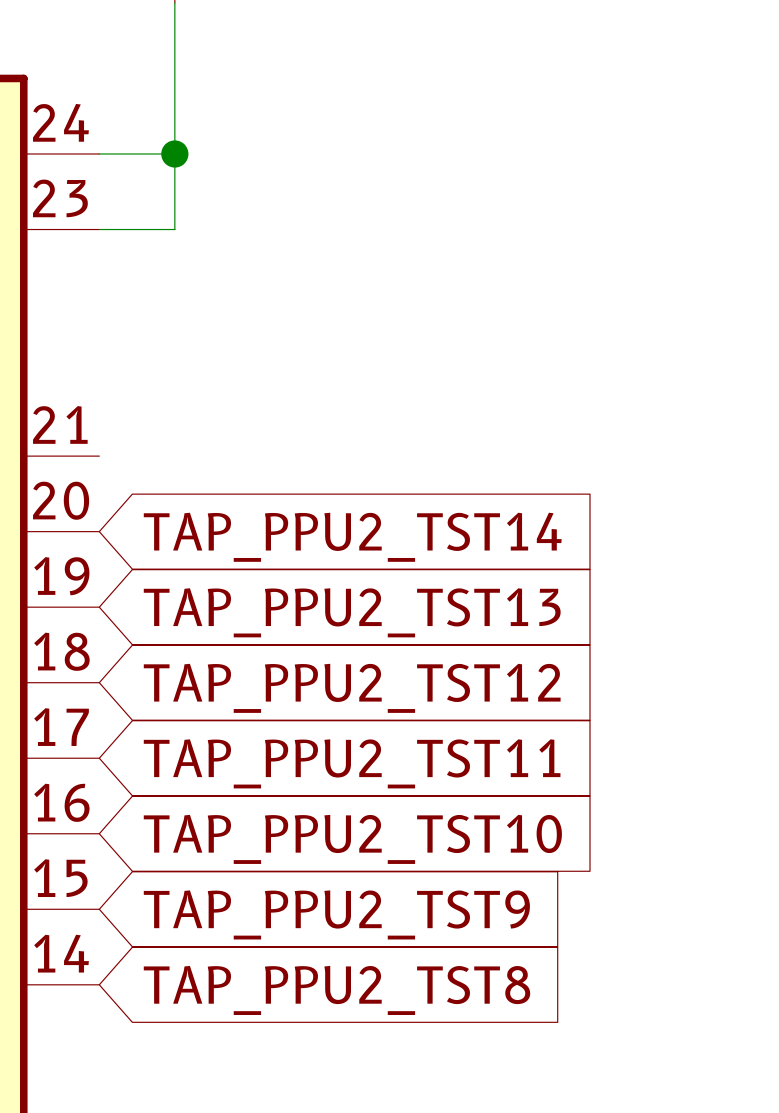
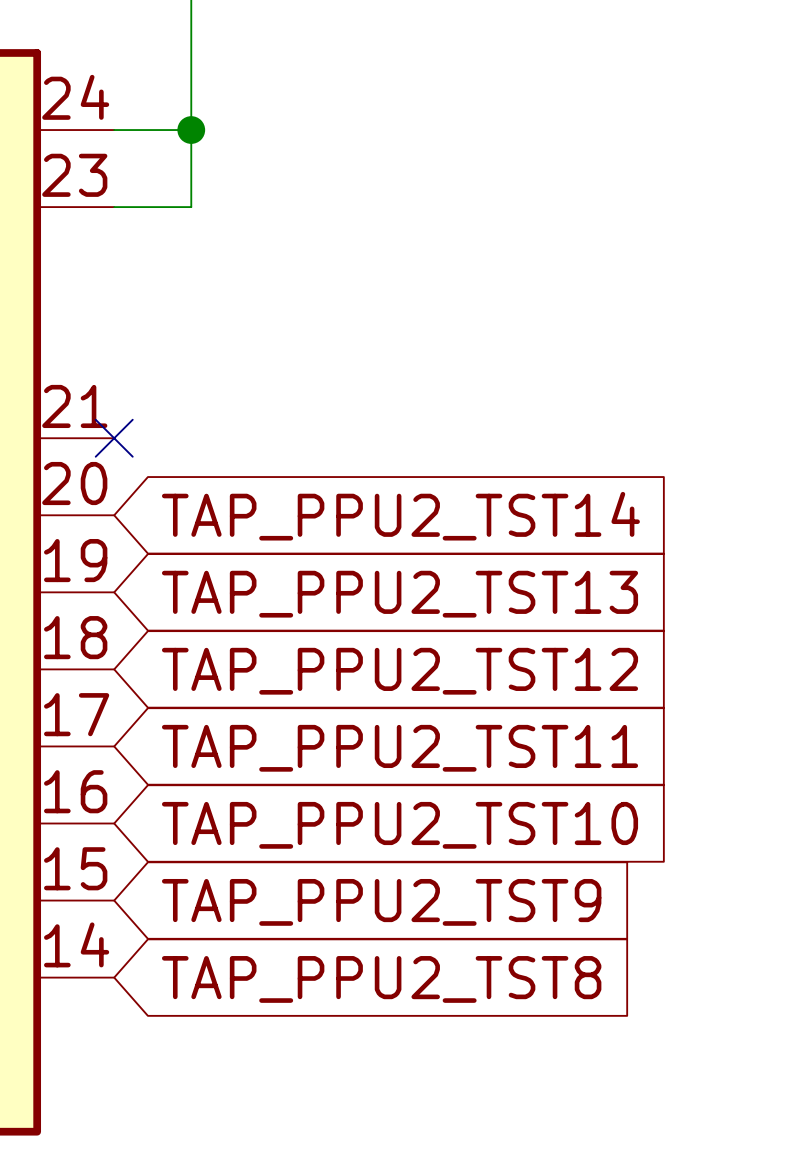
no-connect mark: none -> (114, 438)

